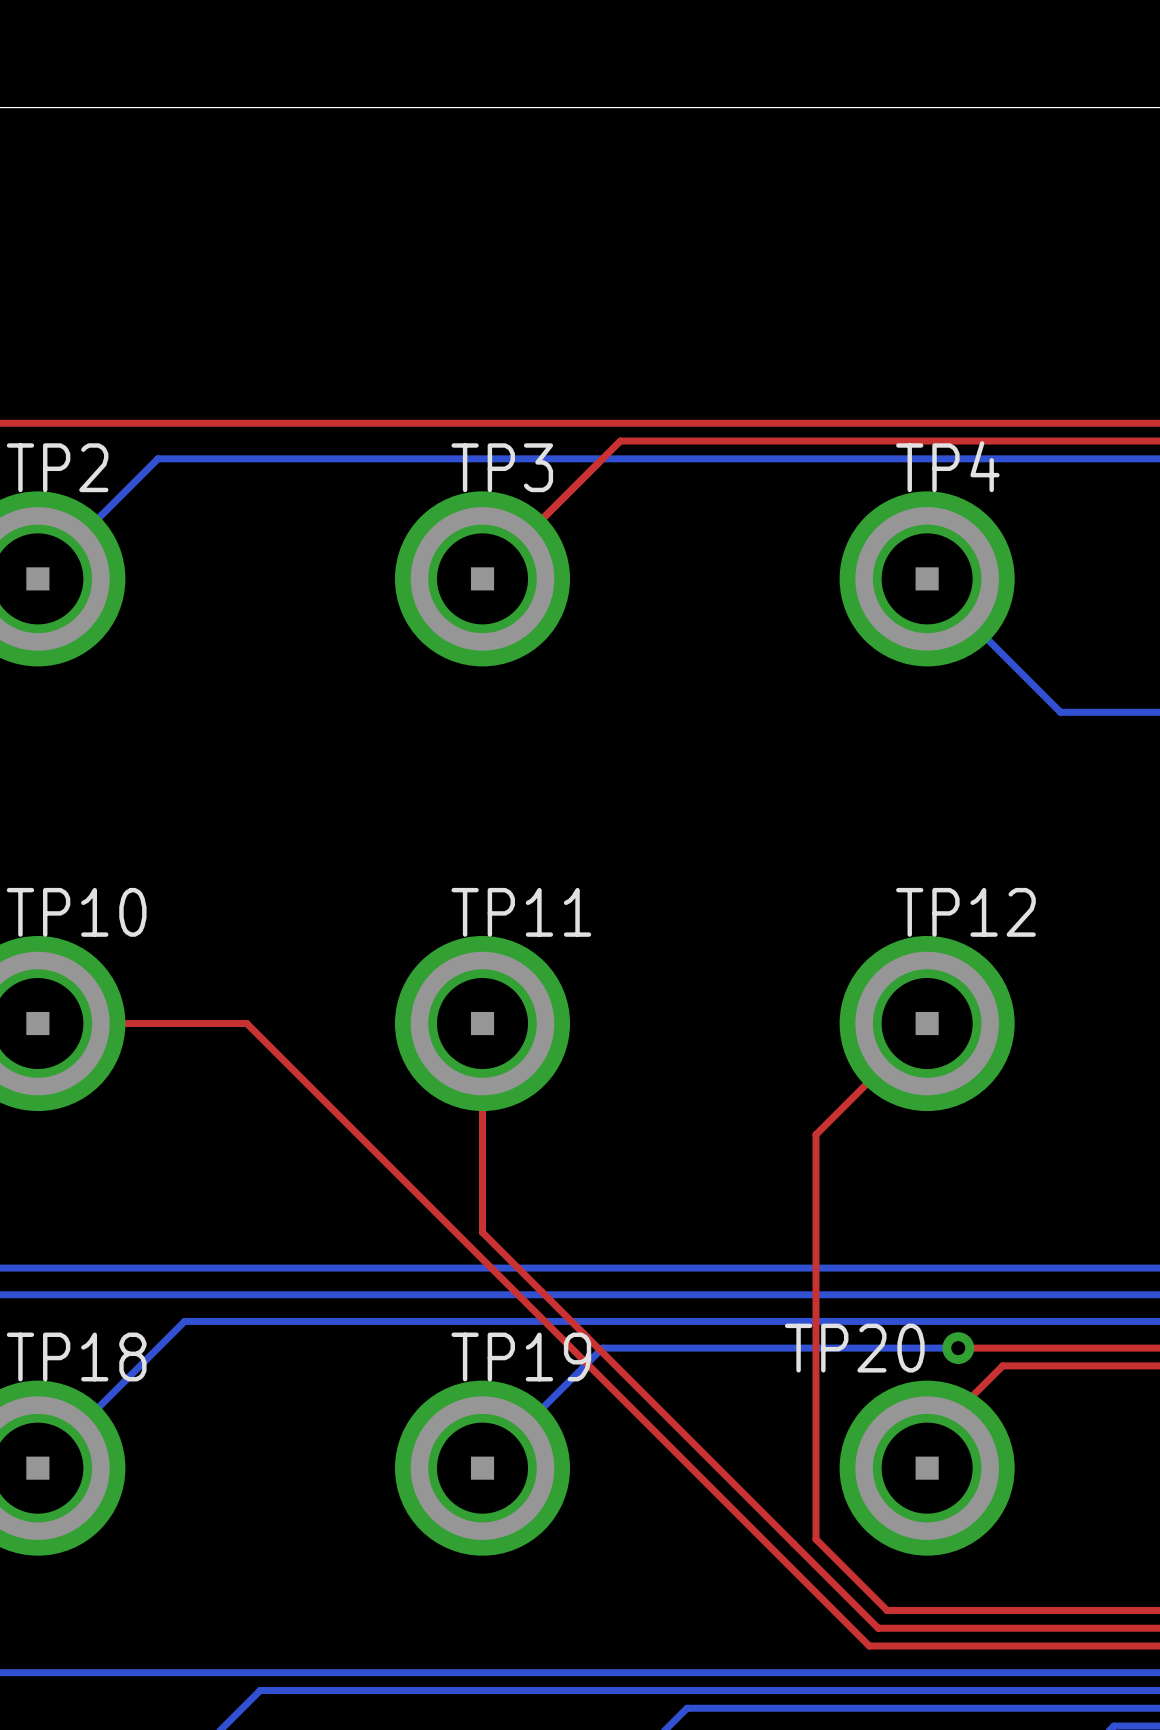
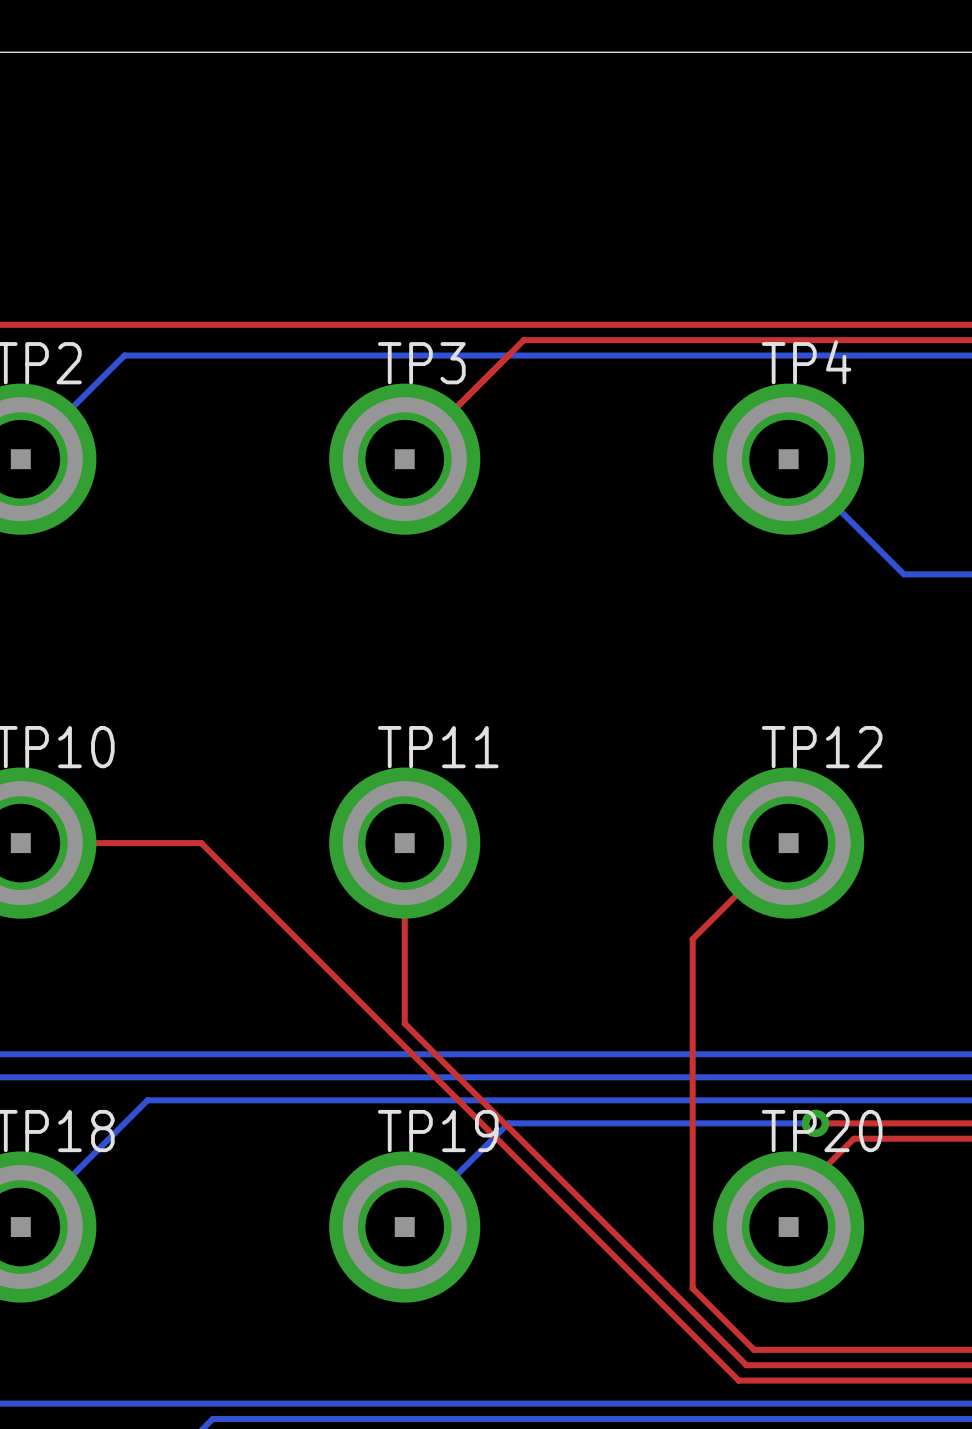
TP20 name position: TP20 (854, 1348) -> TP20 (822, 1131)

